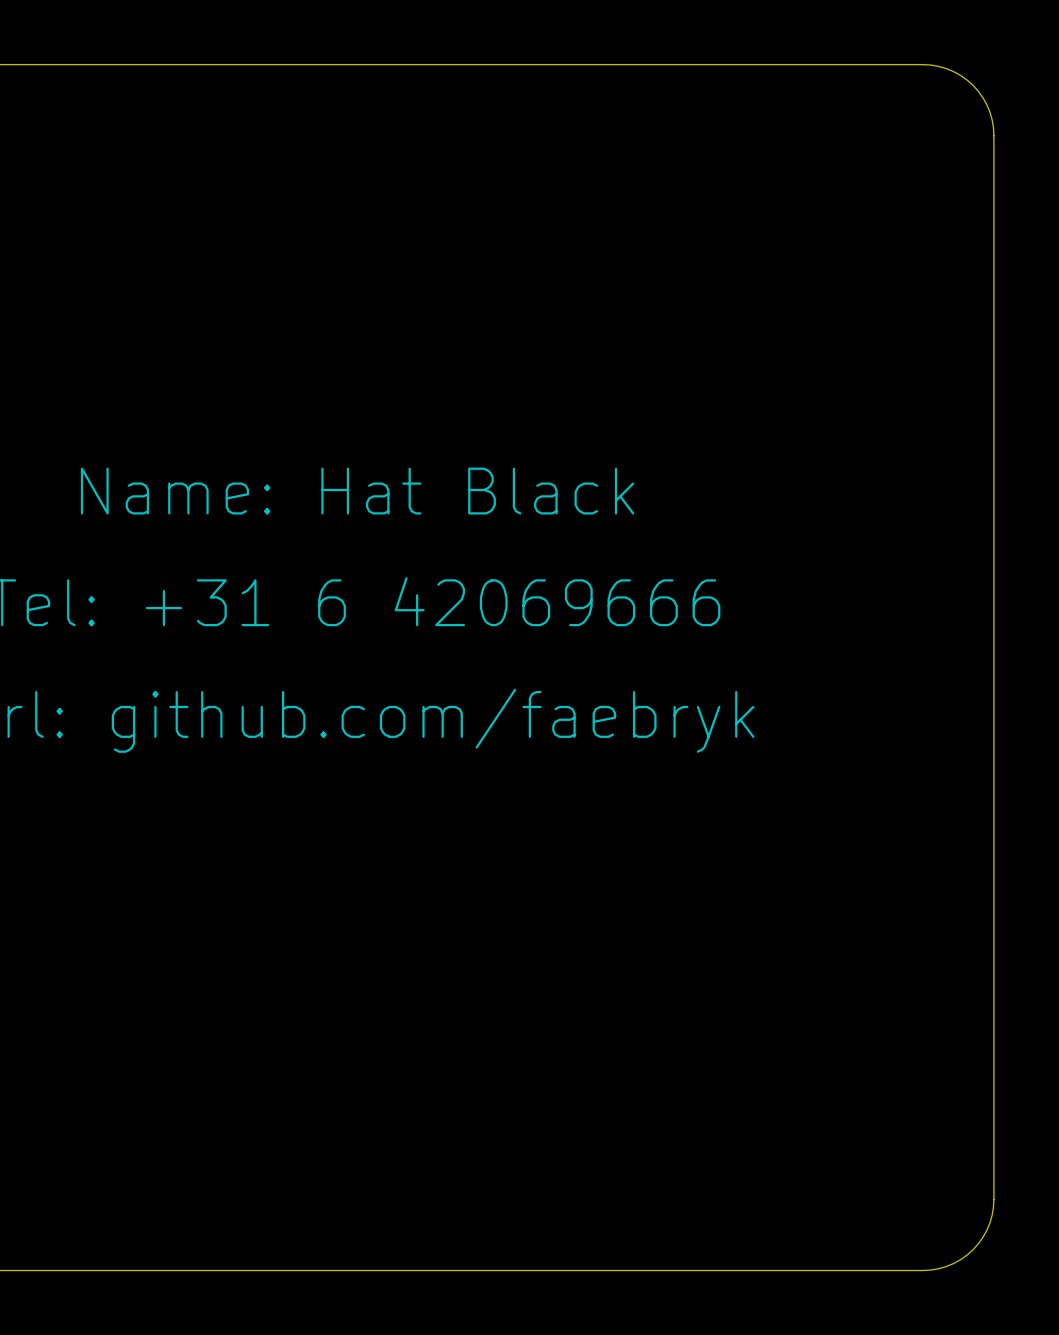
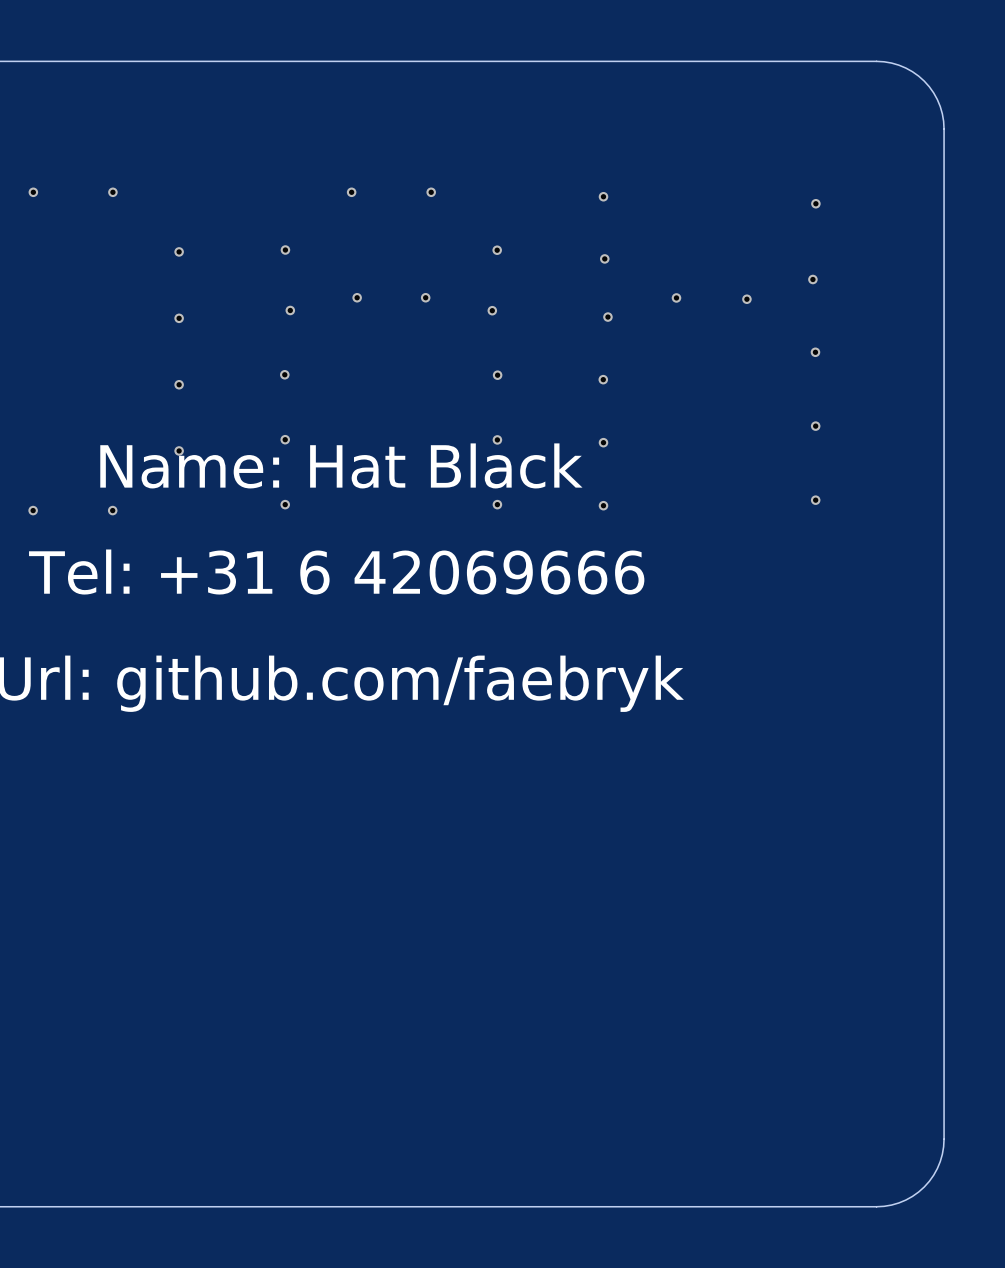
via: none -> (33, 192)
via: none -> (112, 192)
via: none -> (351, 192)
via: none -> (431, 192)
via: none -> (603, 196)
via: none -> (815, 203)
via: none -> (285, 250)
via: none -> (497, 250)
via: none -> (179, 251)
via: none -> (604, 258)
via: none -> (812, 279)
via: none -> (357, 297)
via: none -> (425, 297)
via: none -> (676, 297)
via: none -> (746, 299)
via: none -> (290, 310)
via: none -> (492, 310)
via: none -> (607, 317)
via: none -> (179, 318)
via: none -> (815, 352)
via: none -> (284, 374)
via: none -> (497, 375)
via: none -> (603, 379)
via: none -> (179, 384)
via: none -> (815, 426)
via: none -> (285, 439)
via: none -> (497, 439)
via: none -> (603, 442)
via: none -> (179, 450)
via: none -> (815, 500)
via: none -> (285, 504)
via: none -> (497, 504)
via: none -> (603, 505)
via: none -> (33, 510)
via: none -> (112, 510)

